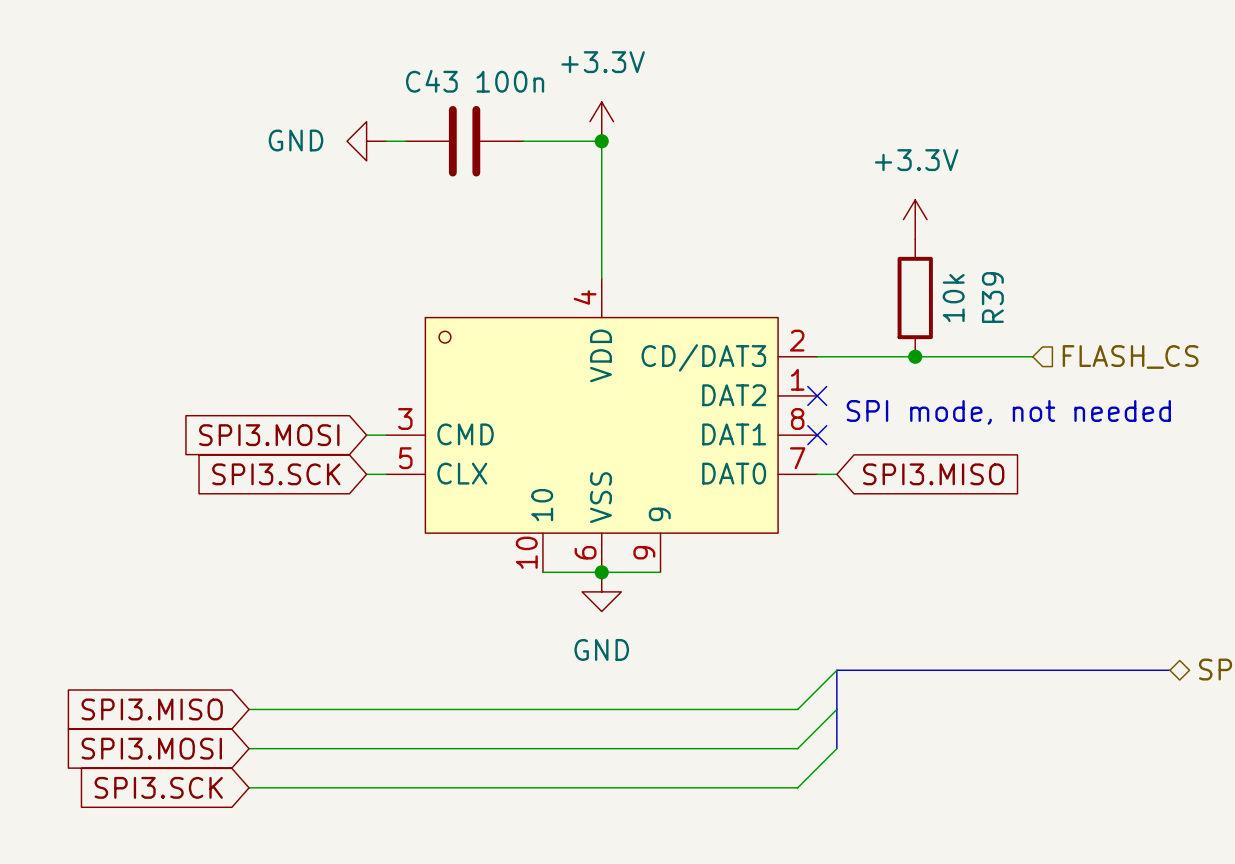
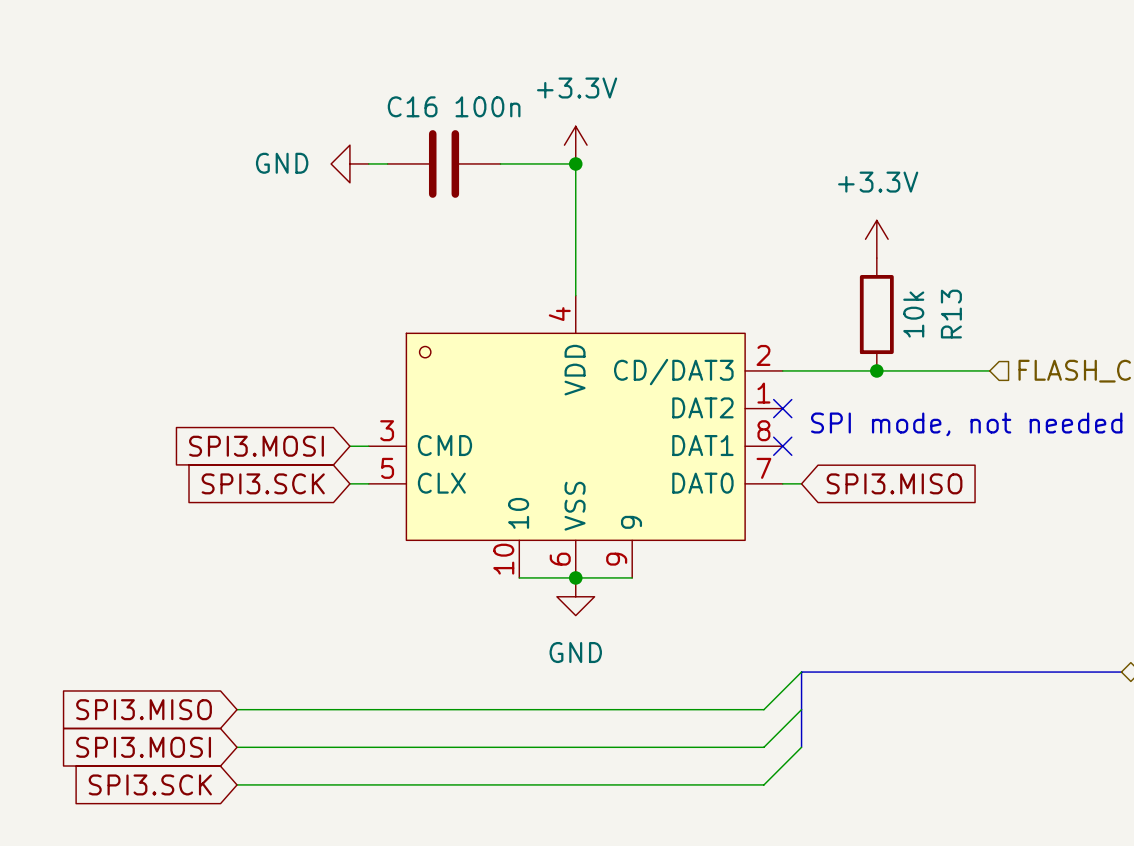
C43 name: C43 (431, 81) -> C16 (412, 106)
R39 name: R39 (992, 297) -> R13 (951, 314)

